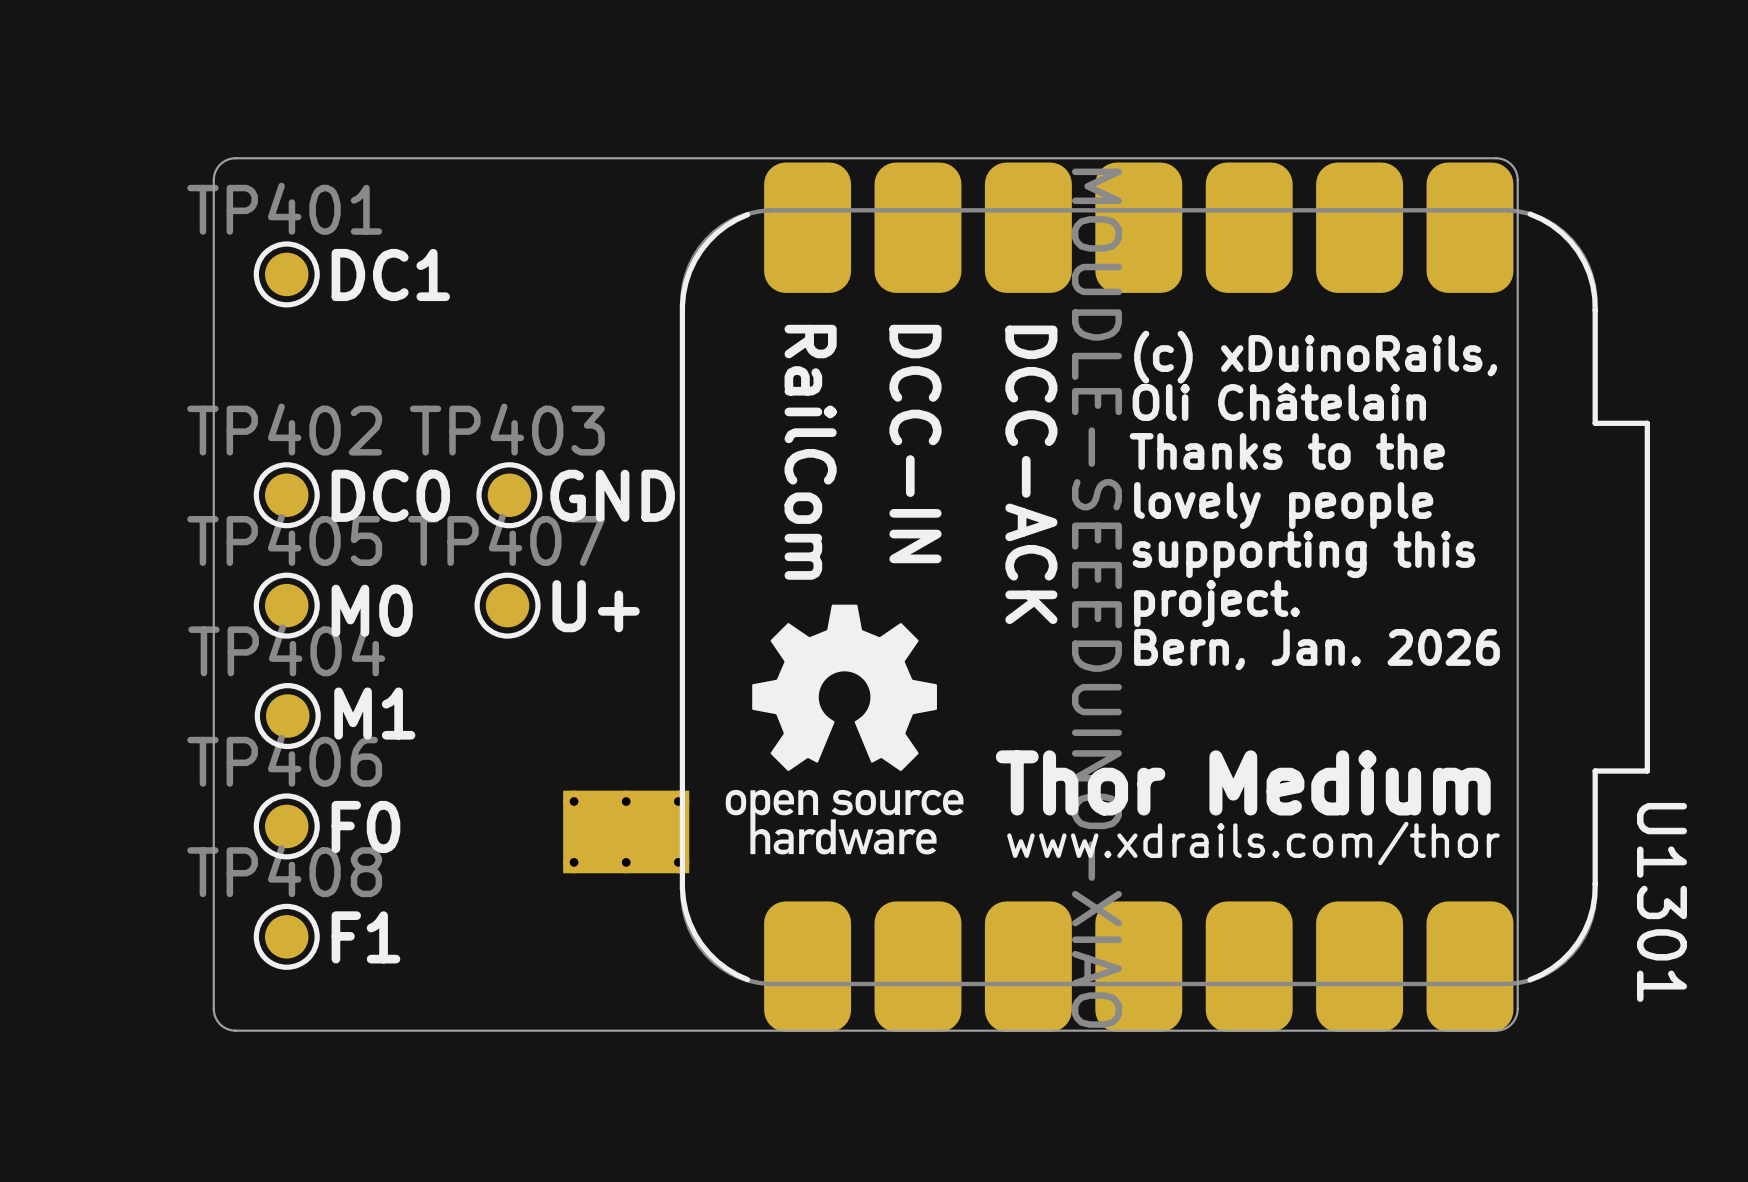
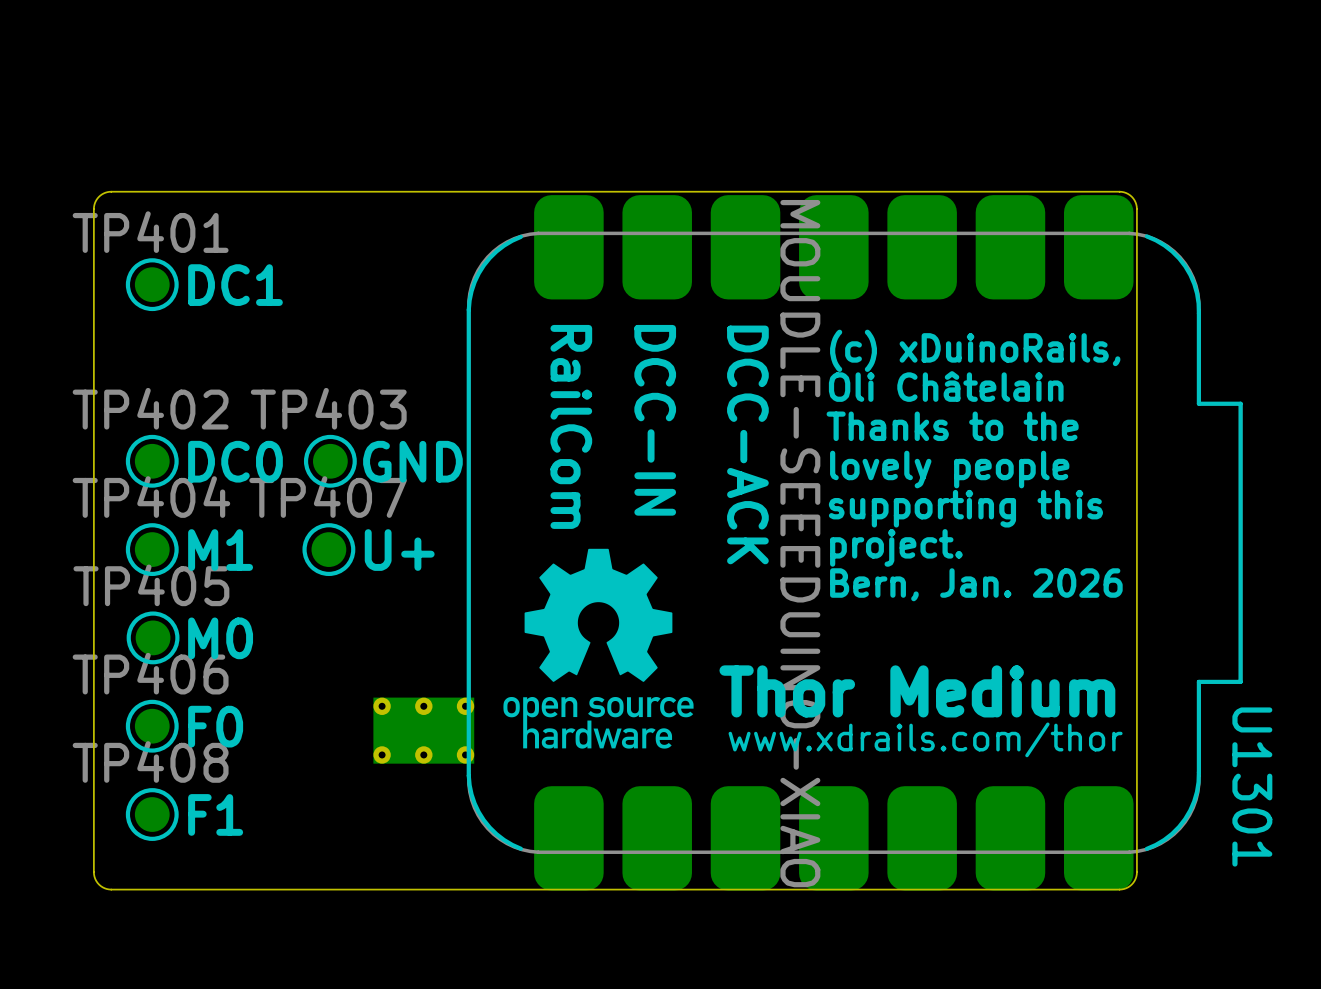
TP405 name: TP405 (284, 539) -> TP404 (151, 497)
text: M0 (372, 610) -> M1 (220, 550)
TP404 name: TP404 (286, 650) -> TP405 (151, 585)
text: M1 (374, 713) -> M0 (220, 638)

